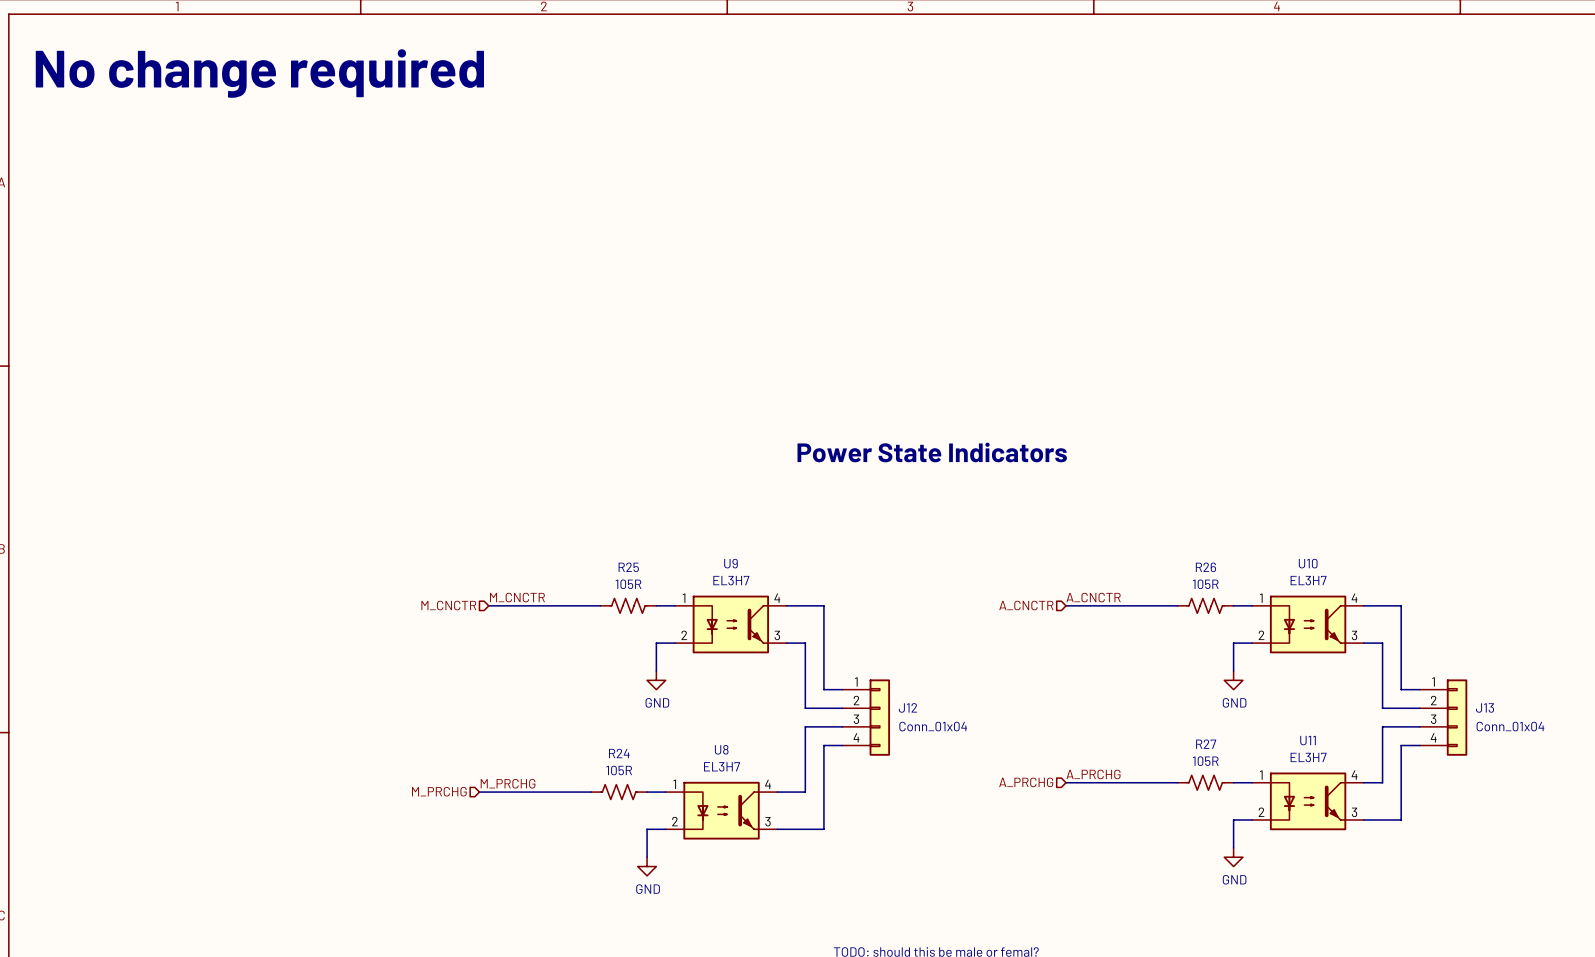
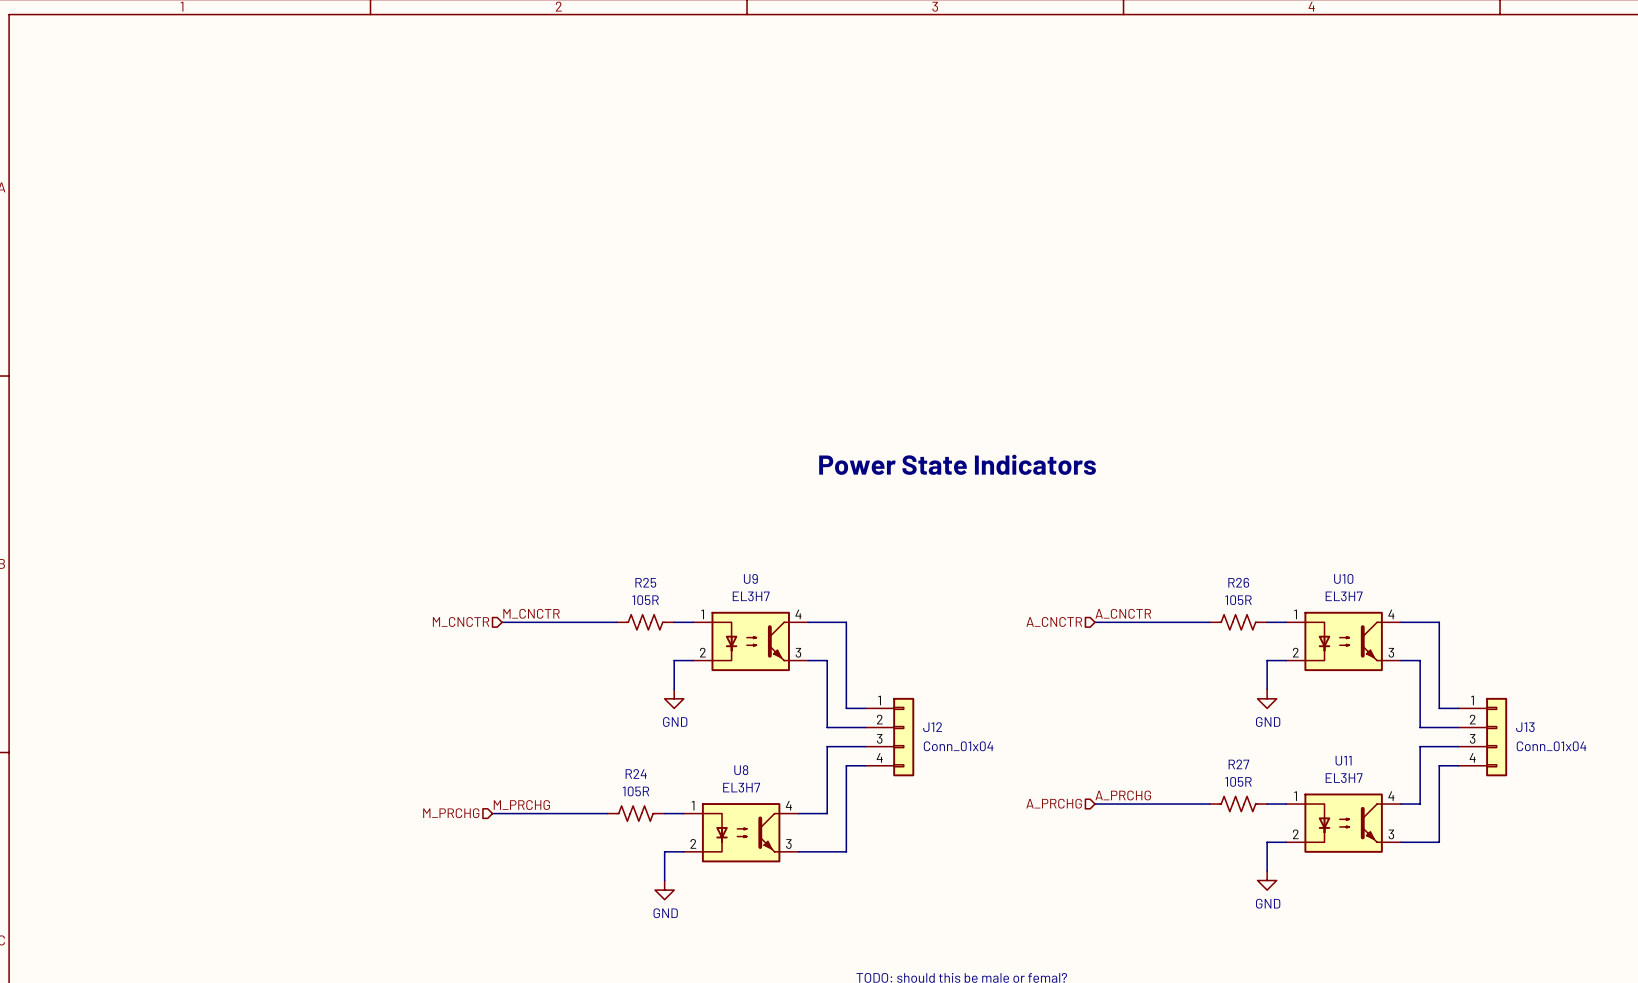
text: No change required (259, 73) -> none

